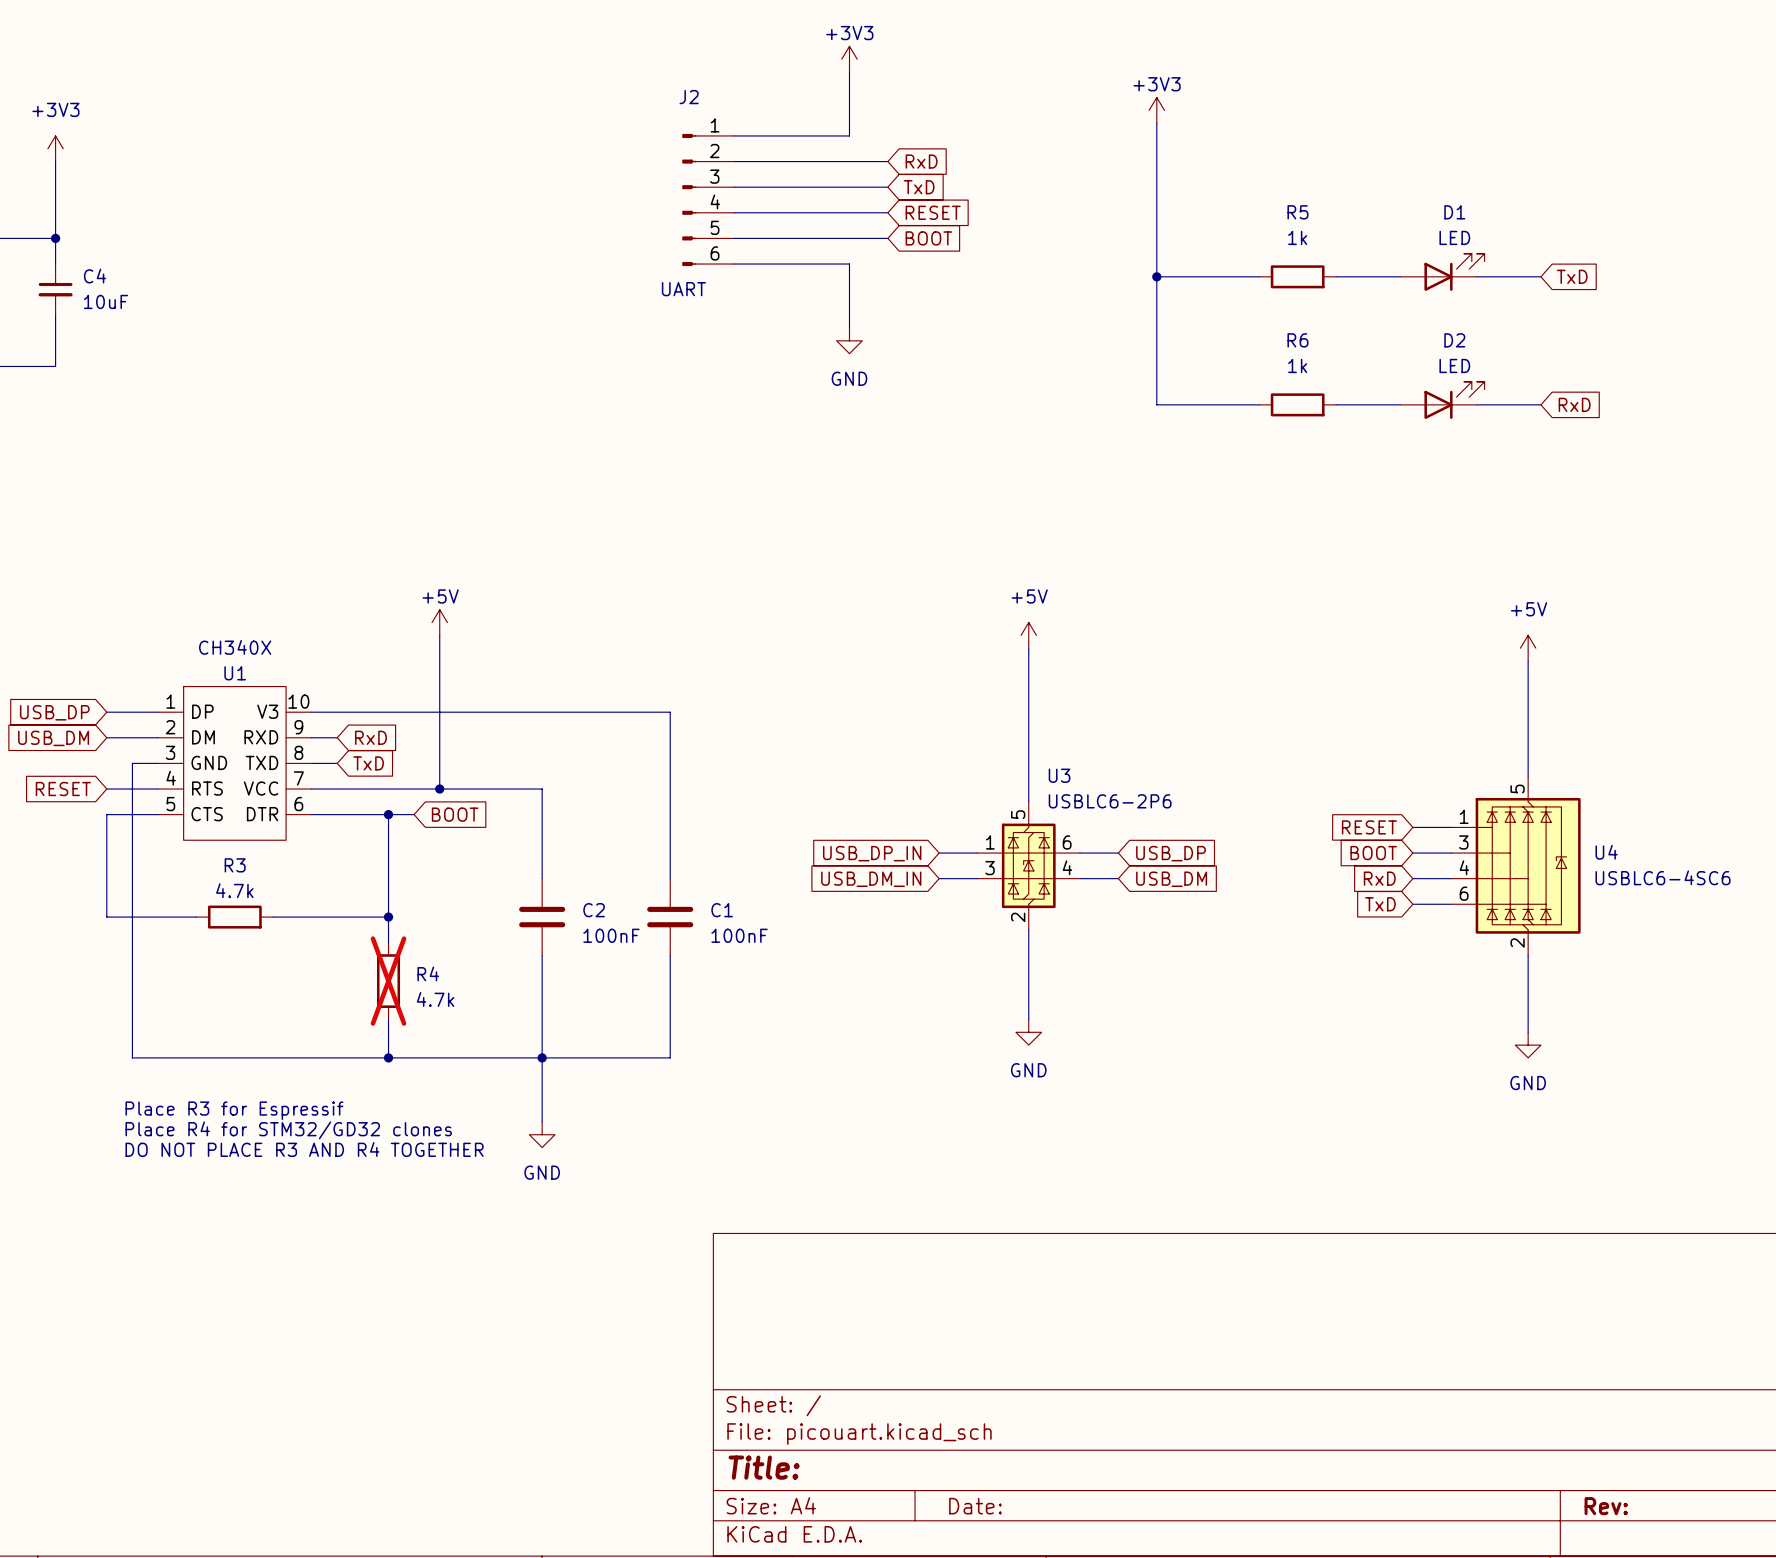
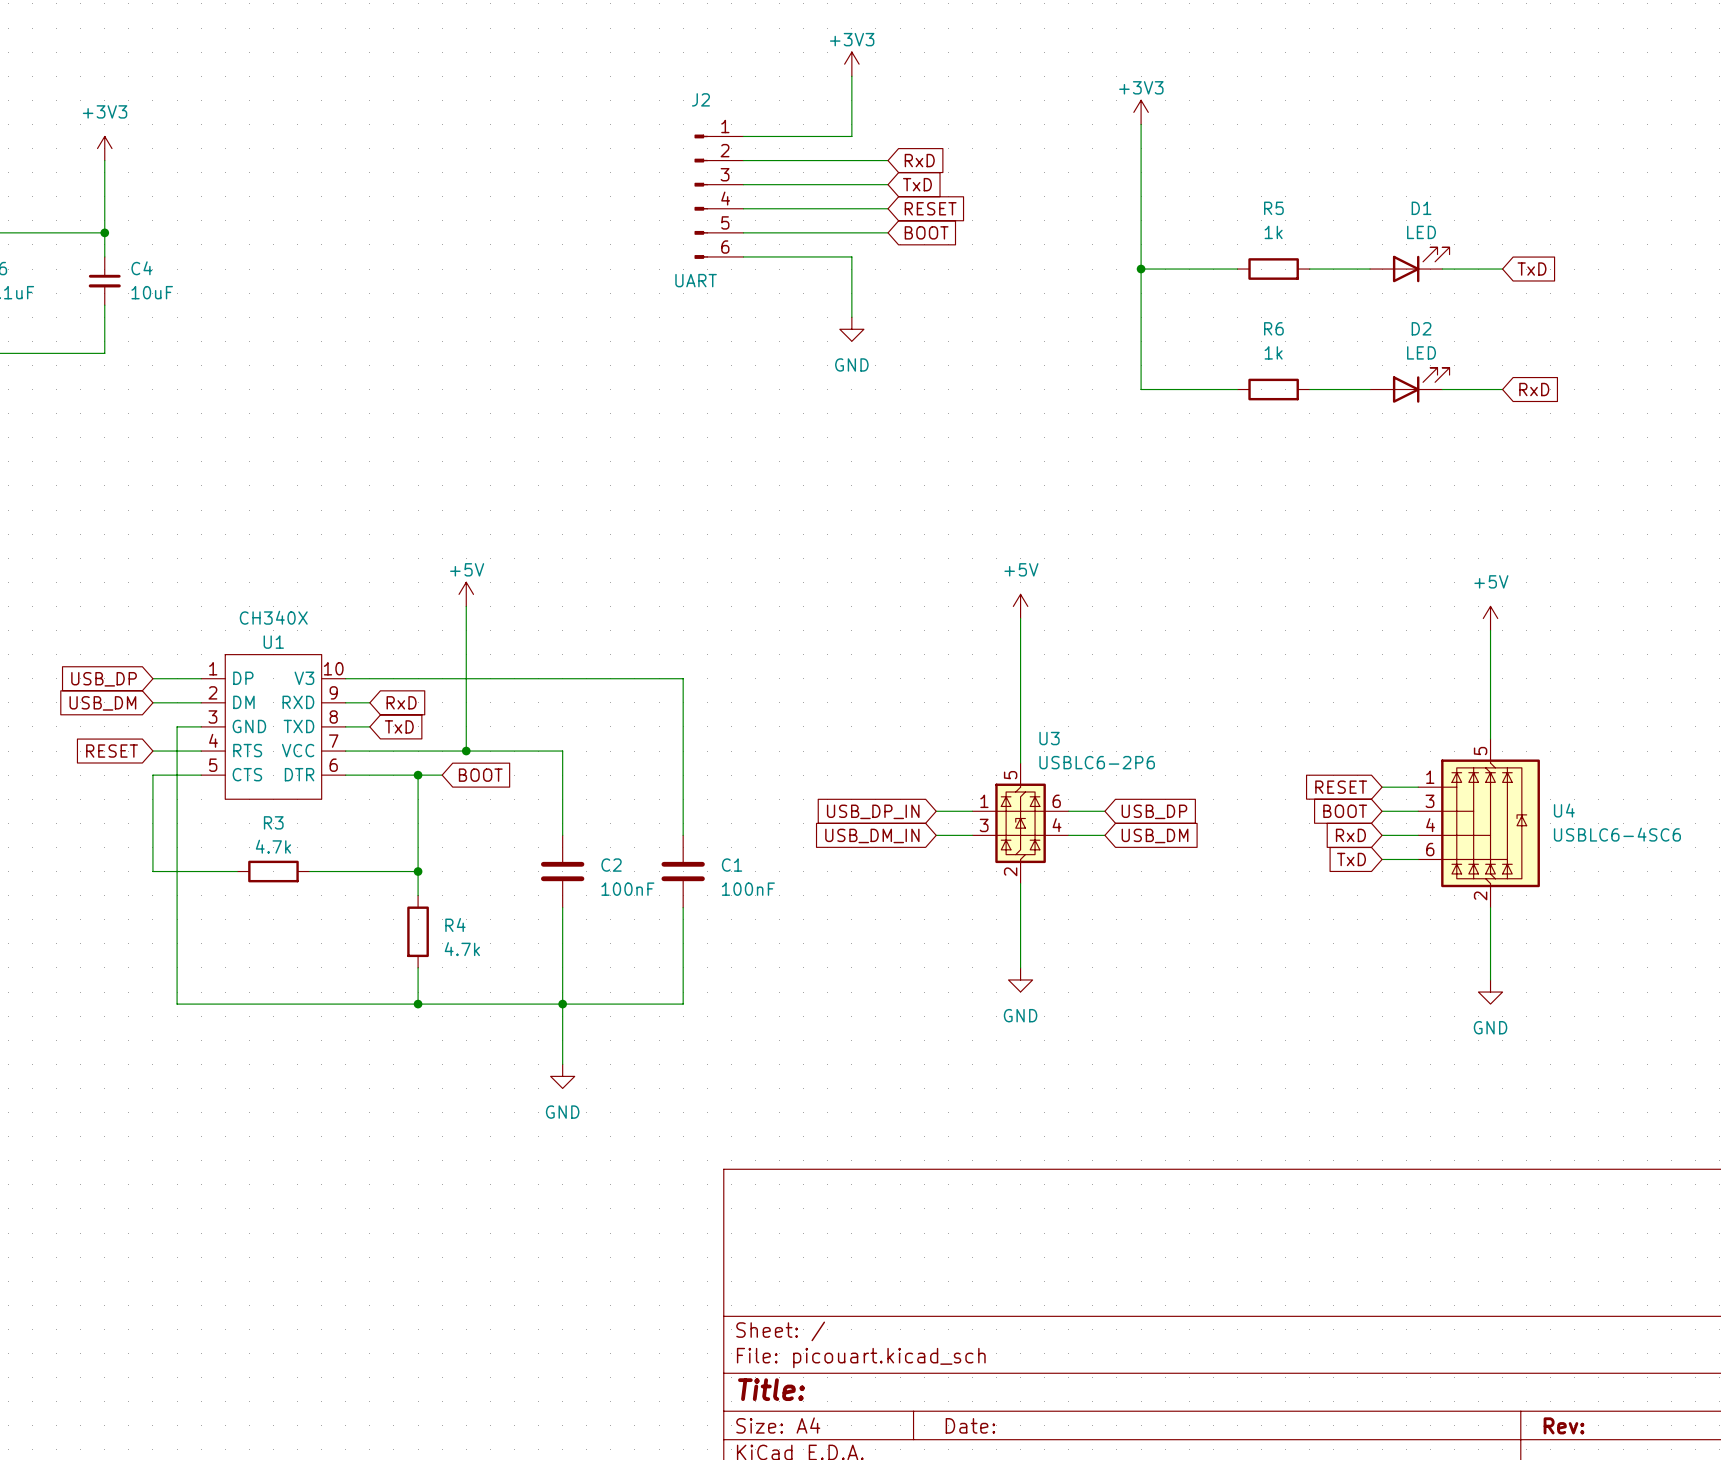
R4 do-not-place cross: (388, 981) -> none
text: Place R3 for Espressif (234, 1110) -> none
text: Place R4 for STM32/GD32 clones (288, 1130) -> none
text: DO NOT PLACE R3 AND R4 TOGETHER (304, 1149) -> none

